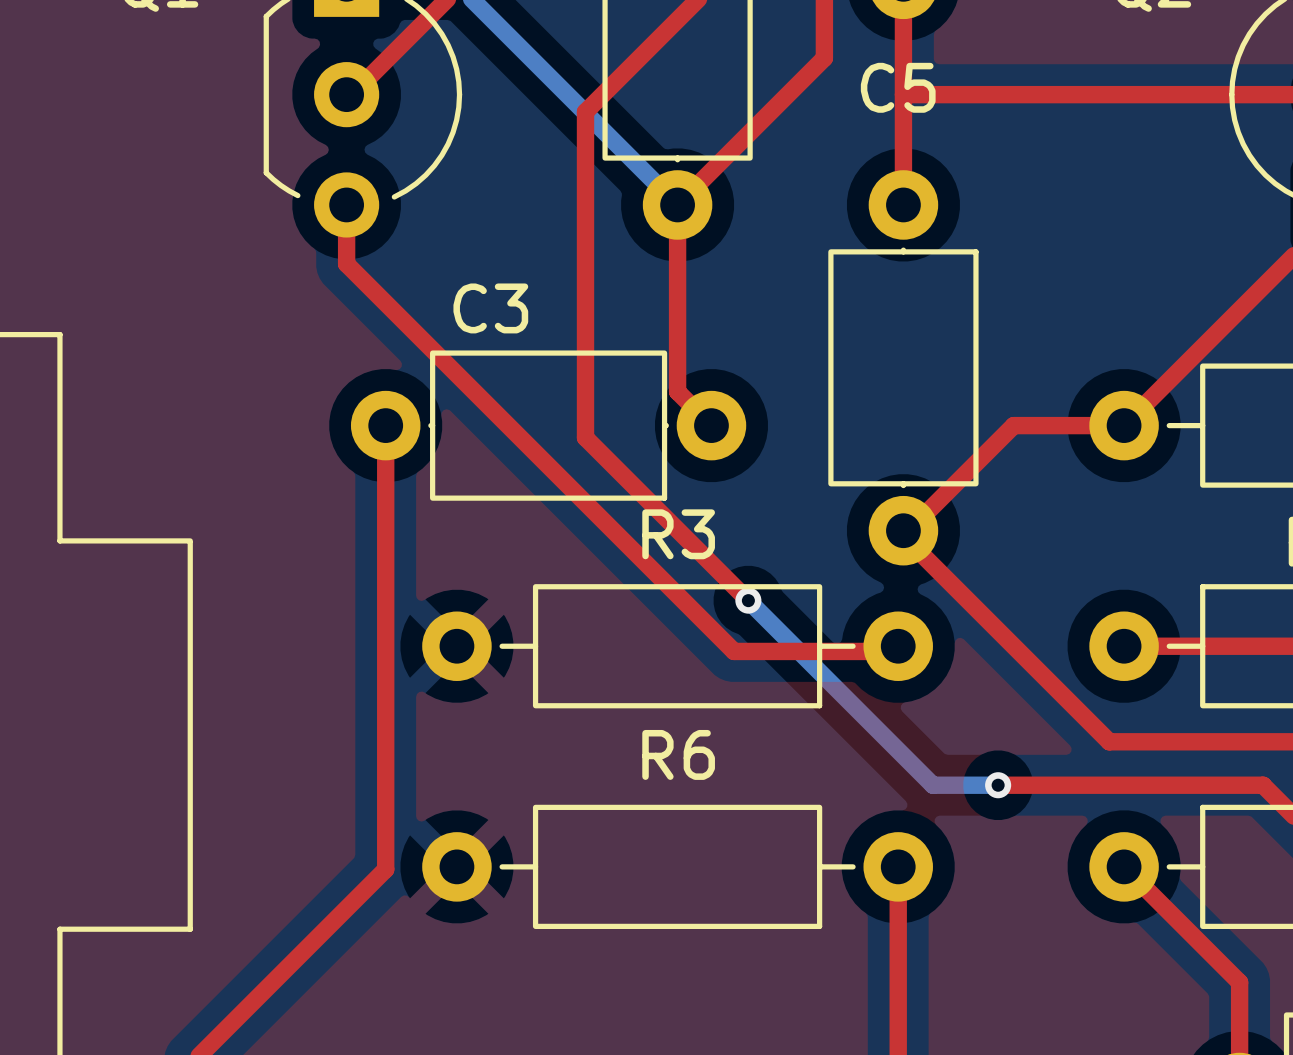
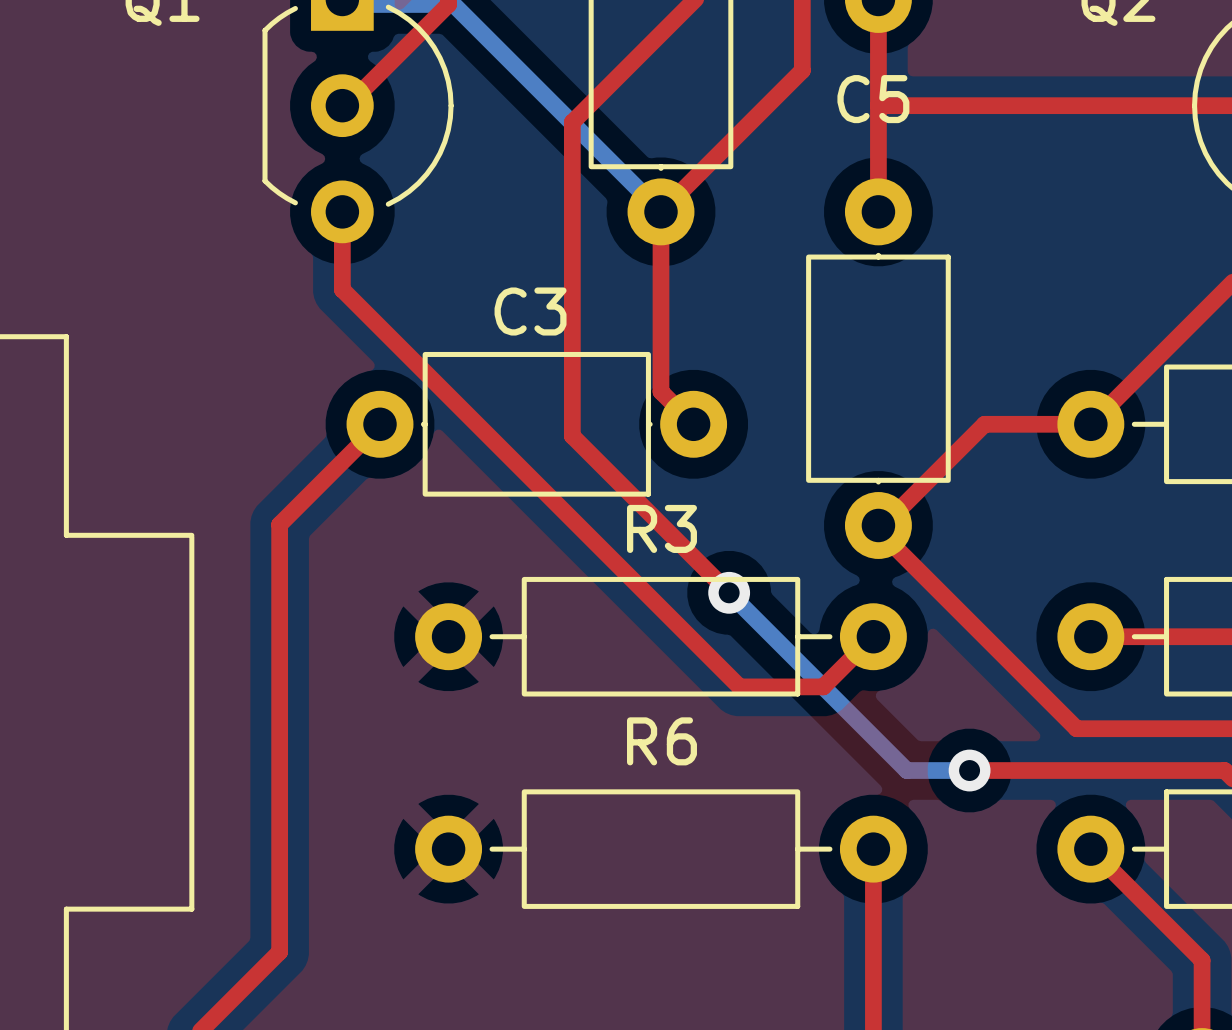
top track: (346, 264) (734, 651) (893, 651) -> (342, 268) (342, 289) (739, 686) (823, 686) (868, 641)
C3 name position: C3 (490, 308) -> C3 (530, 311)
top track: (385, 425) (385, 869) (281, 973) -> (380, 424) (279, 524) (279, 951)
via size: [735, 587, 762, 614] -> [708, 571, 751, 614]
via size: [985, 772, 1012, 799] -> [948, 749, 991, 792]

